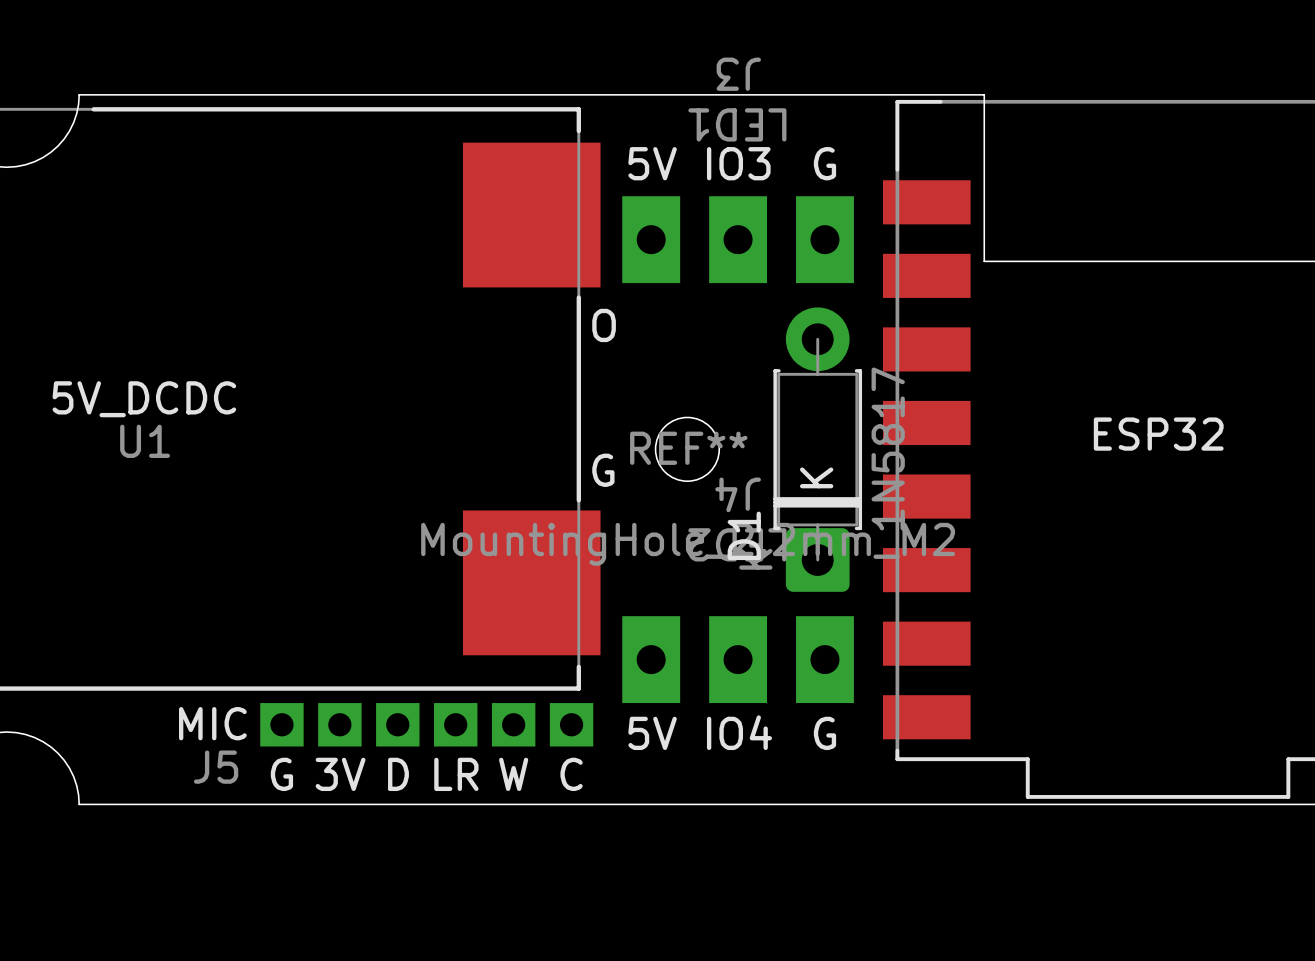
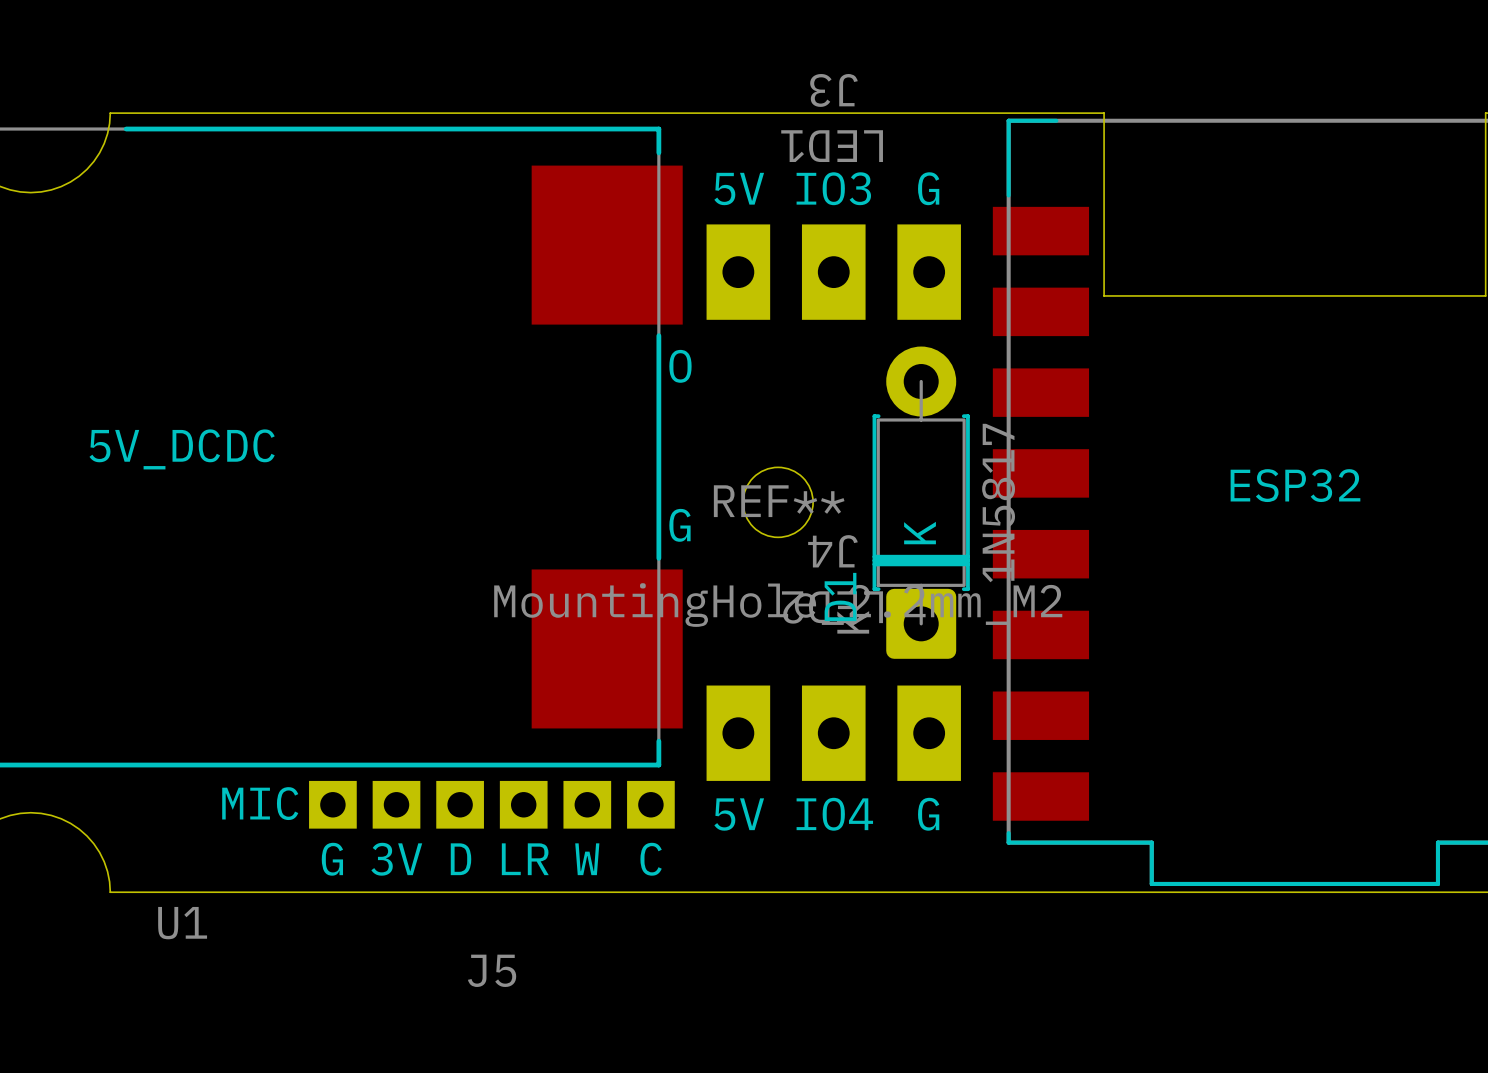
U1 name position: U1 (145, 441) -> U1 (182, 923)
J5 name position: J5 (216, 767) -> J5 (492, 970)

